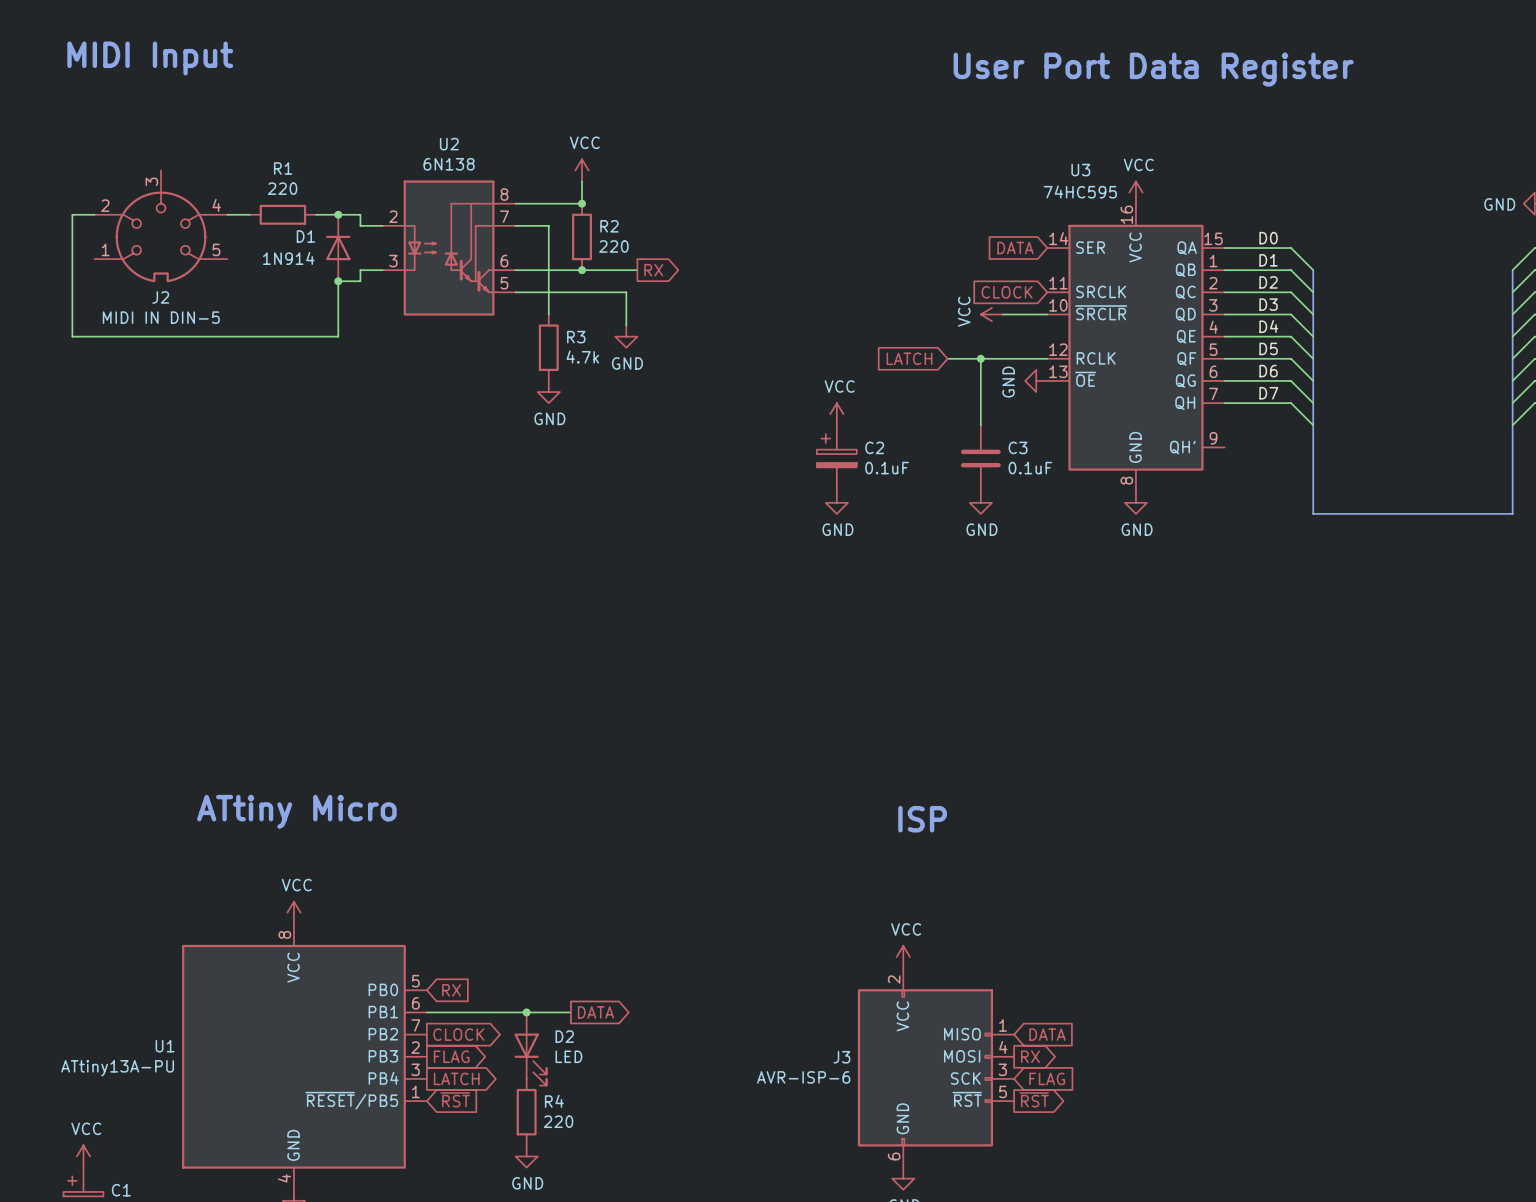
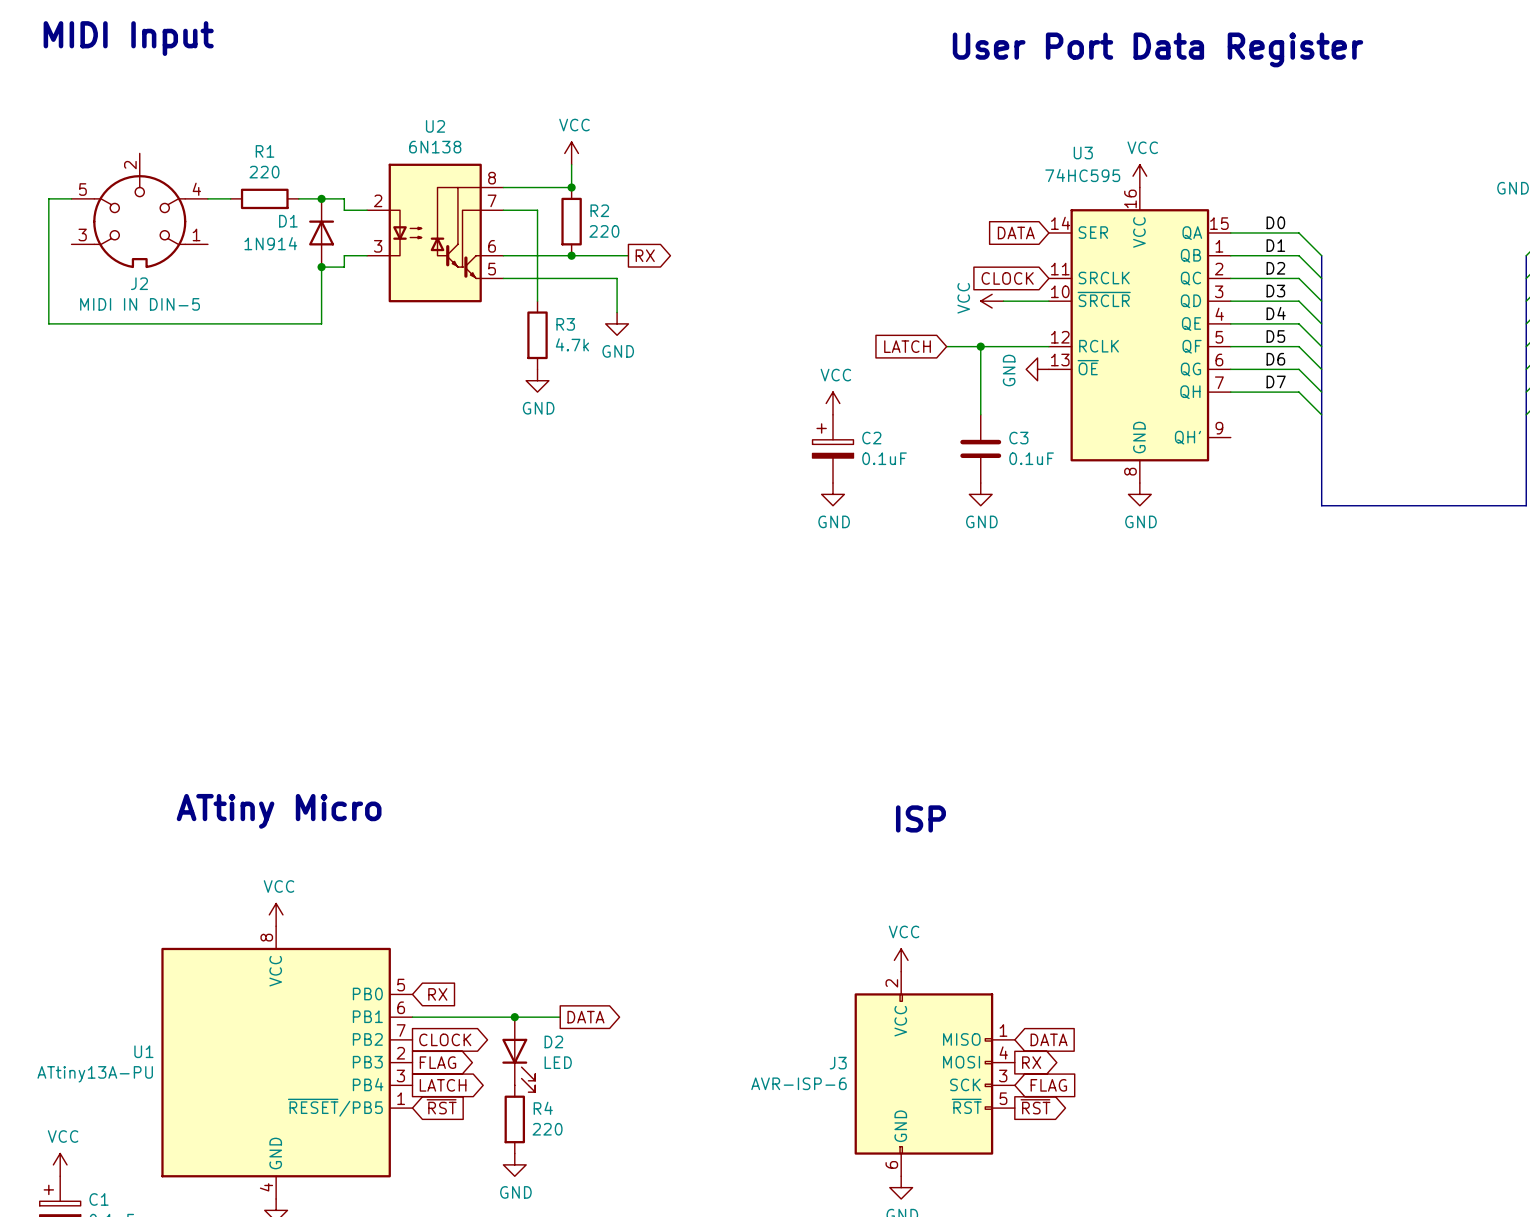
J2 pin number: 3 (151, 181) -> 2 (130, 165)
J2 pin number: 2 (105, 205) -> 5 (82, 189)
J2 pin number: 1 (105, 249) -> 3 (82, 234)
J2 pin number: 5 (216, 249) -> 1 (196, 234)

